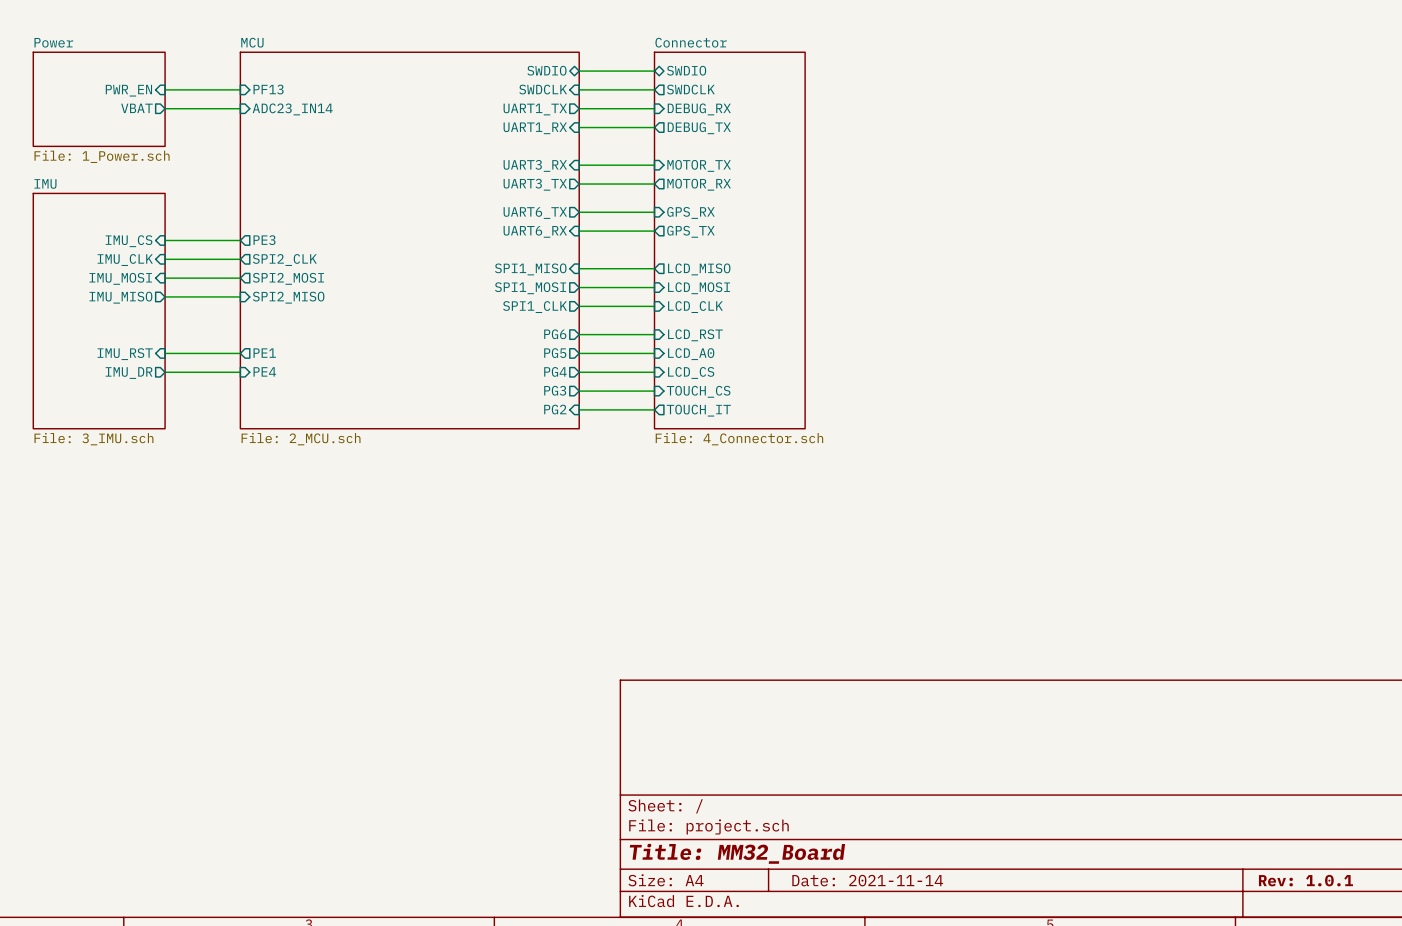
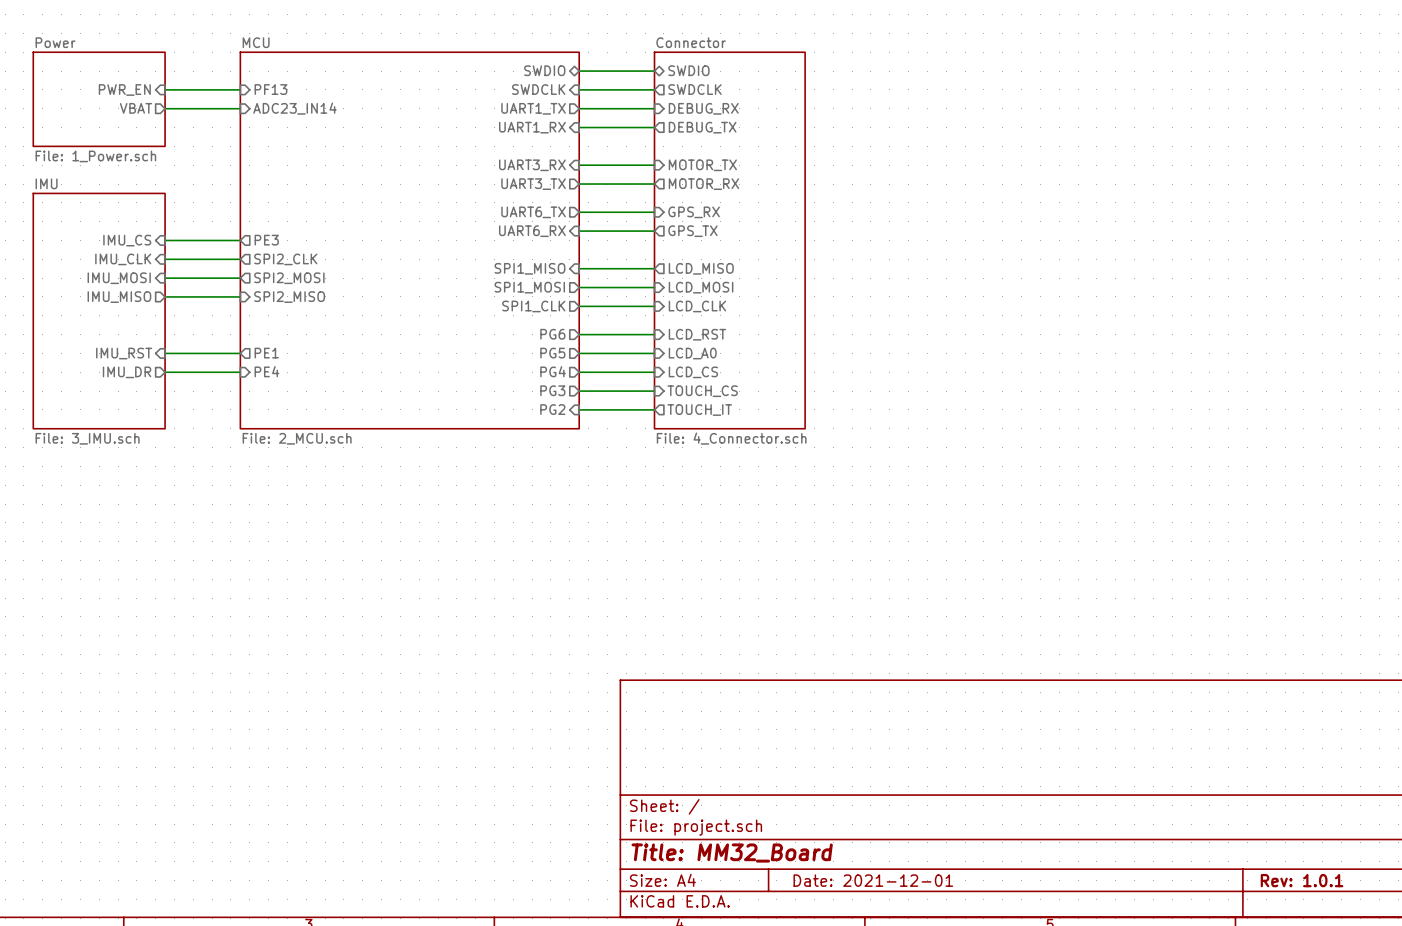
title block: Date: 2021-11-14 (867, 880) -> Date: 2021-12-01 (873, 880)

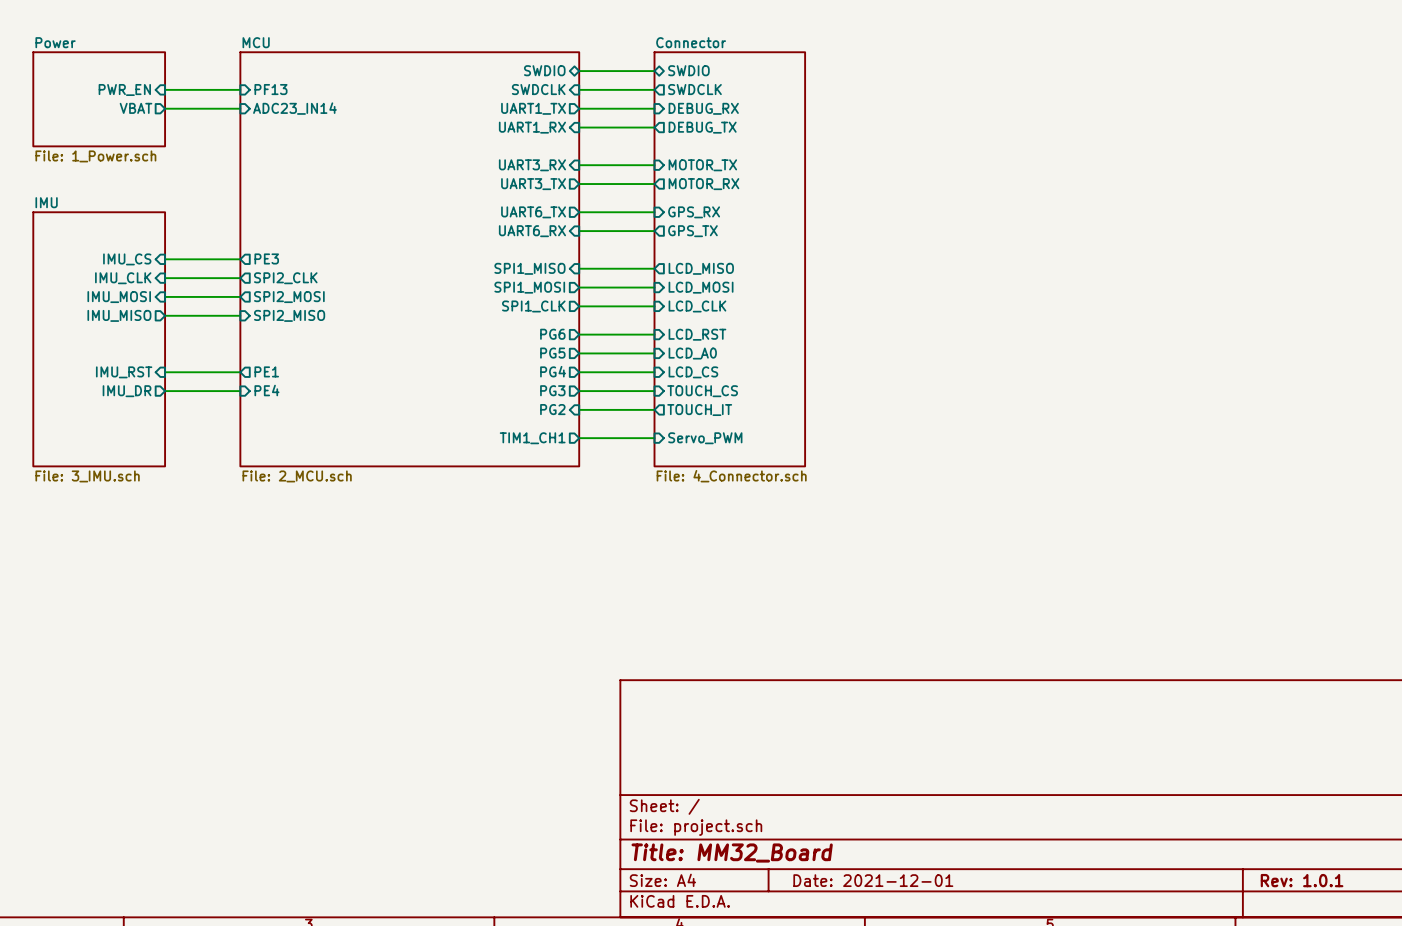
sheet pin: IMU_CS (127, 240) -> none
wire: (165, 240) (240, 240) -> (165, 391) (240, 391)
sheet pin: PE3 (266, 240) -> none
sheet MCU: File: 2_MCU.sch (409, 240) -> none
sheet Connector: File: 4_Connector.sch (729, 240) -> none
sheet pin: IMU_CLK (123, 259) -> IMU_CS (127, 259)
sheet pin: SPI2_CLK (285, 259) -> PE3 (266, 258)
sheet MCU: none -> File: 2_MCU.sch (409, 259)
sheet Connector: none -> File: 4_Connector.sch (729, 259)
sheet pin: IMU_MOSI (119, 278) -> IMU_CLK (123, 278)
sheet pin: SPI2_MOSI (289, 278) -> SPI2_CLK (285, 278)
sheet pin shape: output (119, 297) -> input (119, 297)
sheet pin: IMU_MISO (119, 297) -> IMU_MOSI (119, 297)
sheet pin shape: input (289, 297) -> output (289, 297)
sheet pin: SPI2_MISO (289, 297) -> SPI2_MOSI (289, 297)
sheet IMU: File: 3_IMU.sch (99, 311) -> none
sheet pin: none -> IMU_MISO (119, 315)
sheet pin: none -> SPI2_MISO (289, 315)
sheet IMU: none -> File: 3_IMU.sch (99, 339)
sheet pin: IMU_RST (124, 353) -> none
wire: (165, 353) (240, 353) -> (165, 315) (240, 315)
sheet pin: PE1 (266, 353) -> none
sheet pin shape: input (266, 371) -> output (266, 371)
sheet pin: PE4 (266, 371) -> PE1 (266, 371)
sheet pin shape: output (127, 372) -> input (124, 372)
sheet pin: IMU_DR (127, 372) -> IMU_RST (124, 372)
sheet pin: none -> PE4 (266, 390)
sheet pin: none -> IMU_DR (127, 391)
sheet pin: none -> TIM1_CH1 (532, 438)
wire: none -> (579, 438) (654, 438)
sheet pin: none -> Servo_PWM (705, 438)

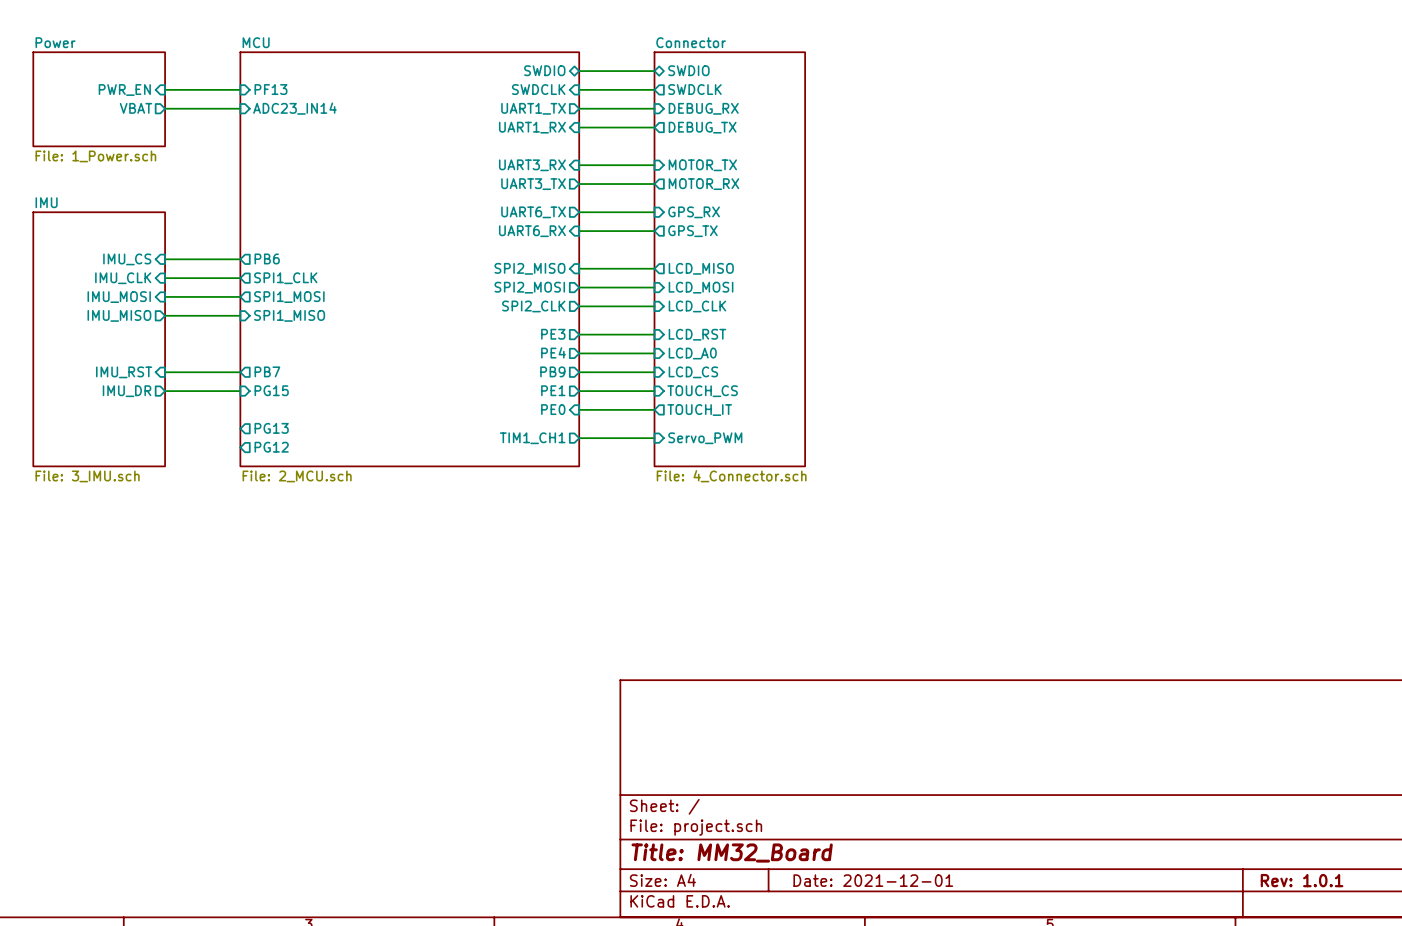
sheet pin: PE3 (266, 258) -> PB6 (267, 258)
sheet pin: SPI1_MISO (529, 268) -> SPI2_MISO (529, 268)
sheet pin: SPI2_CLK (285, 278) -> SPI1_CLK (285, 278)
sheet pin: SPI1_MOSI (529, 287) -> SPI2_MOSI (529, 287)
sheet pin: SPI2_MOSI (289, 297) -> SPI1_MOSI (289, 297)
sheet pin: SPI1_CLK (533, 306) -> SPI2_CLK (533, 306)
sheet pin: SPI2_MISO (289, 315) -> SPI1_MISO (289, 315)
sheet pin: PG6 (552, 334) -> PE3 (553, 334)
sheet pin: PG5 (552, 353) -> PE4 (553, 352)
sheet pin: PE1 (266, 371) -> PB7 (267, 371)
sheet pin: PG4 (553, 371) -> PB9 (552, 371)
sheet pin: PE4 (266, 390) -> PG15 (271, 390)
sheet pin: PG3 (552, 390) -> PE1 (553, 390)
sheet pin: PG2 (552, 409) -> PE0 (553, 409)
sheet pin: none -> PG13 (271, 428)
sheet pin: none -> PG12 (271, 447)

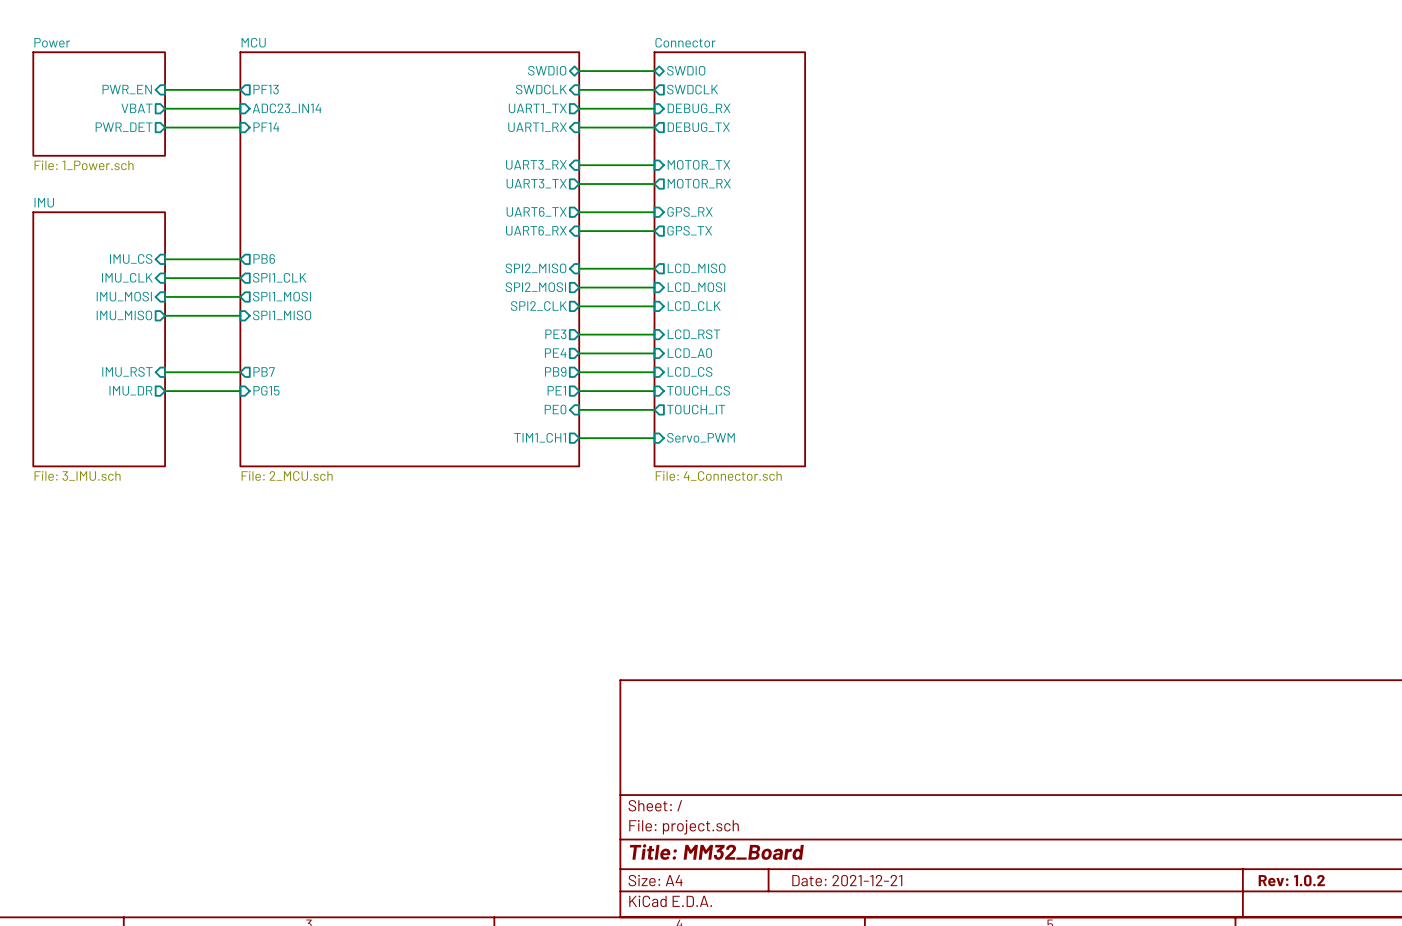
sheet Power shape: [33, 52, 166, 147] -> [33, 52, 166, 156]
sheet pin shape: input (270, 89) -> output (266, 89)
sheet pin: none -> PF14 (266, 127)
sheet pin: none -> PWR_DET (124, 127)
wire: none -> (165, 127) (240, 127)
sheet pin: PG13 (271, 428) -> none
sheet pin: PG12 (271, 447) -> none
title block: Date: 2021-12-01 (873, 880) -> Date: 2021-12-21 (847, 880)
title block: Rev: 1.0.1 (1302, 880) -> Rev: 1.0.2 (1291, 880)

